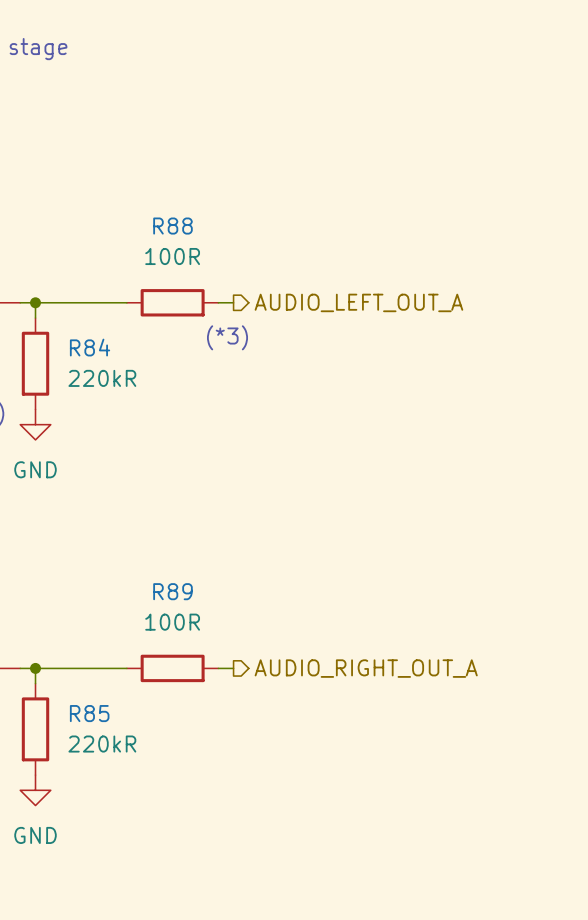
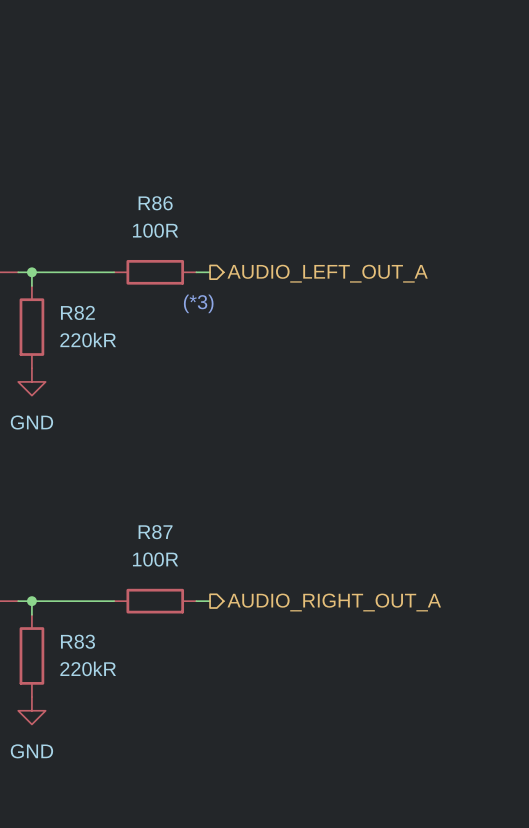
R88 name: R88 (172, 226) -> R86 (155, 203)
R84 name: R84 (90, 347) -> R82 (77, 312)
R89 name: R89 (172, 591) -> R87 (155, 532)
R85 name: R85 (89, 713) -> R83 (77, 641)

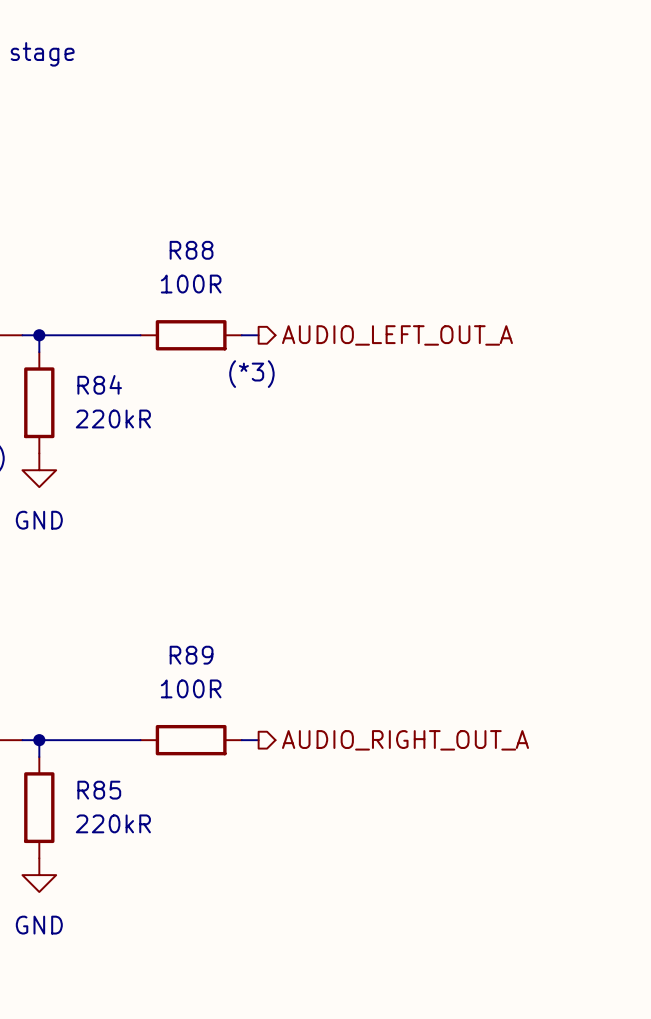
R86 name: R86 (155, 203) -> R88 (191, 250)
R82 name: R82 (77, 312) -> R84 (99, 384)
R87 name: R87 (155, 532) -> R89 (191, 655)
R83 name: R83 (77, 641) -> R85 (99, 790)

